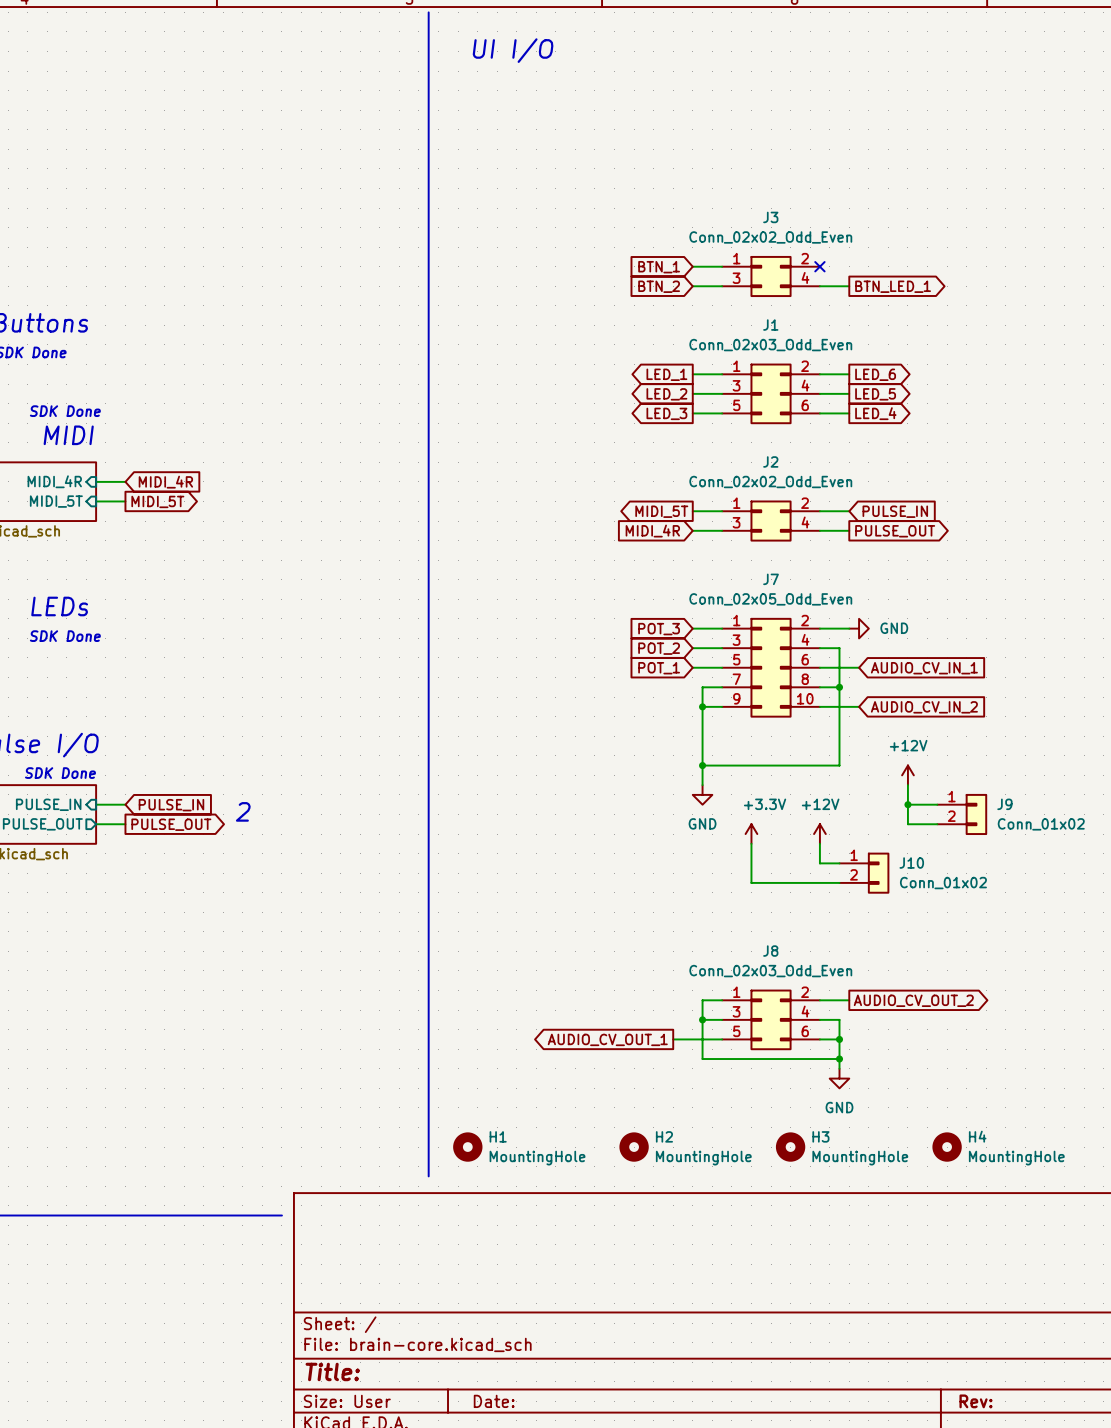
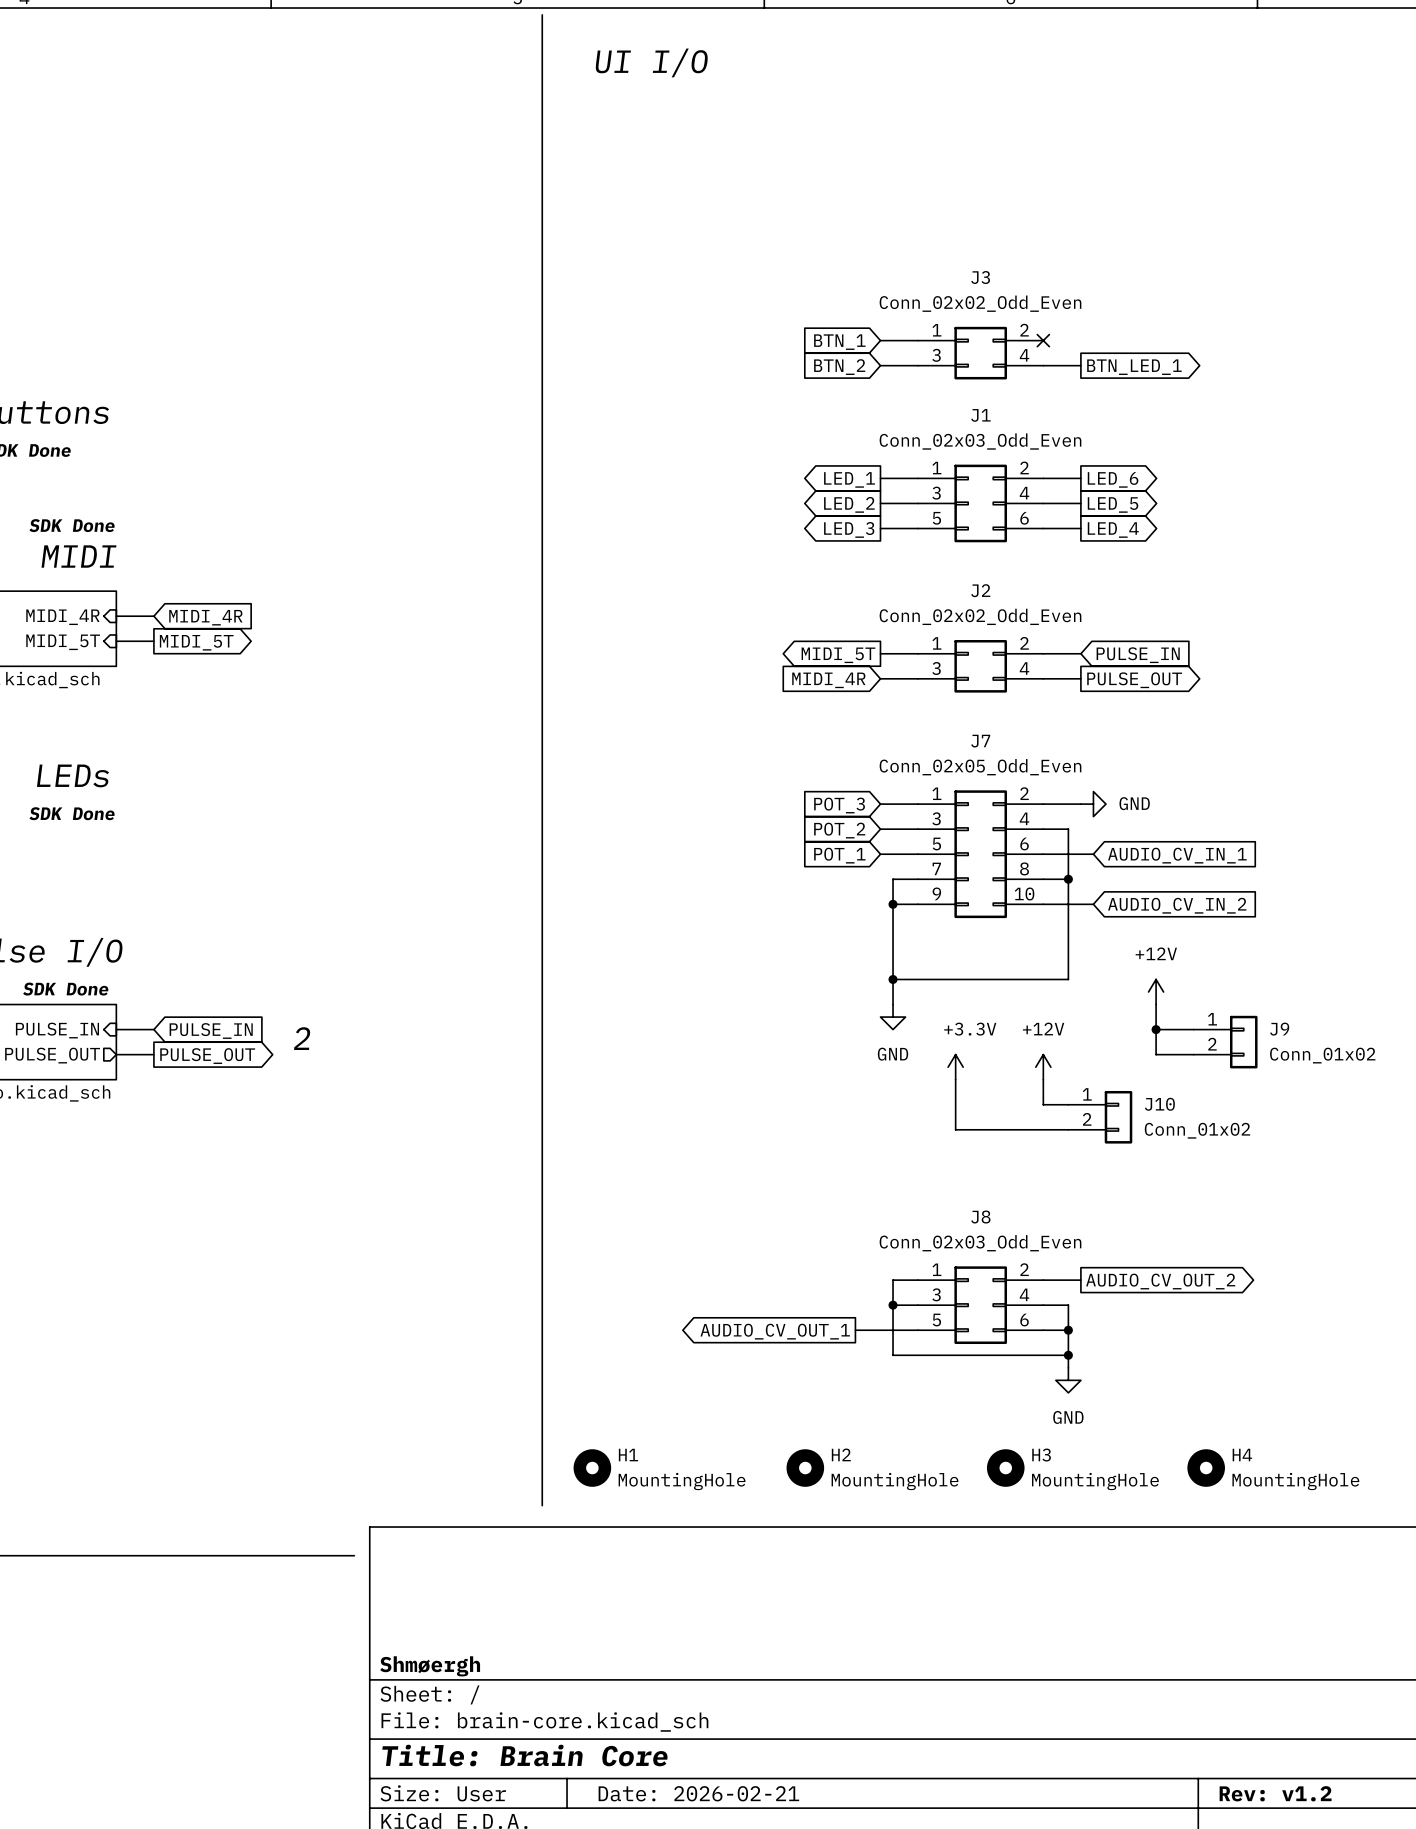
title block: none -> Shmøergh (430, 1666)
title block: Title: (332, 1371) -> Title: Brain Core (524, 1755)
title block: Date: (494, 1401) -> Date: 2026-02-21 (698, 1793)
title block: Rev: (976, 1401) -> Rev: v1.2 (1275, 1793)

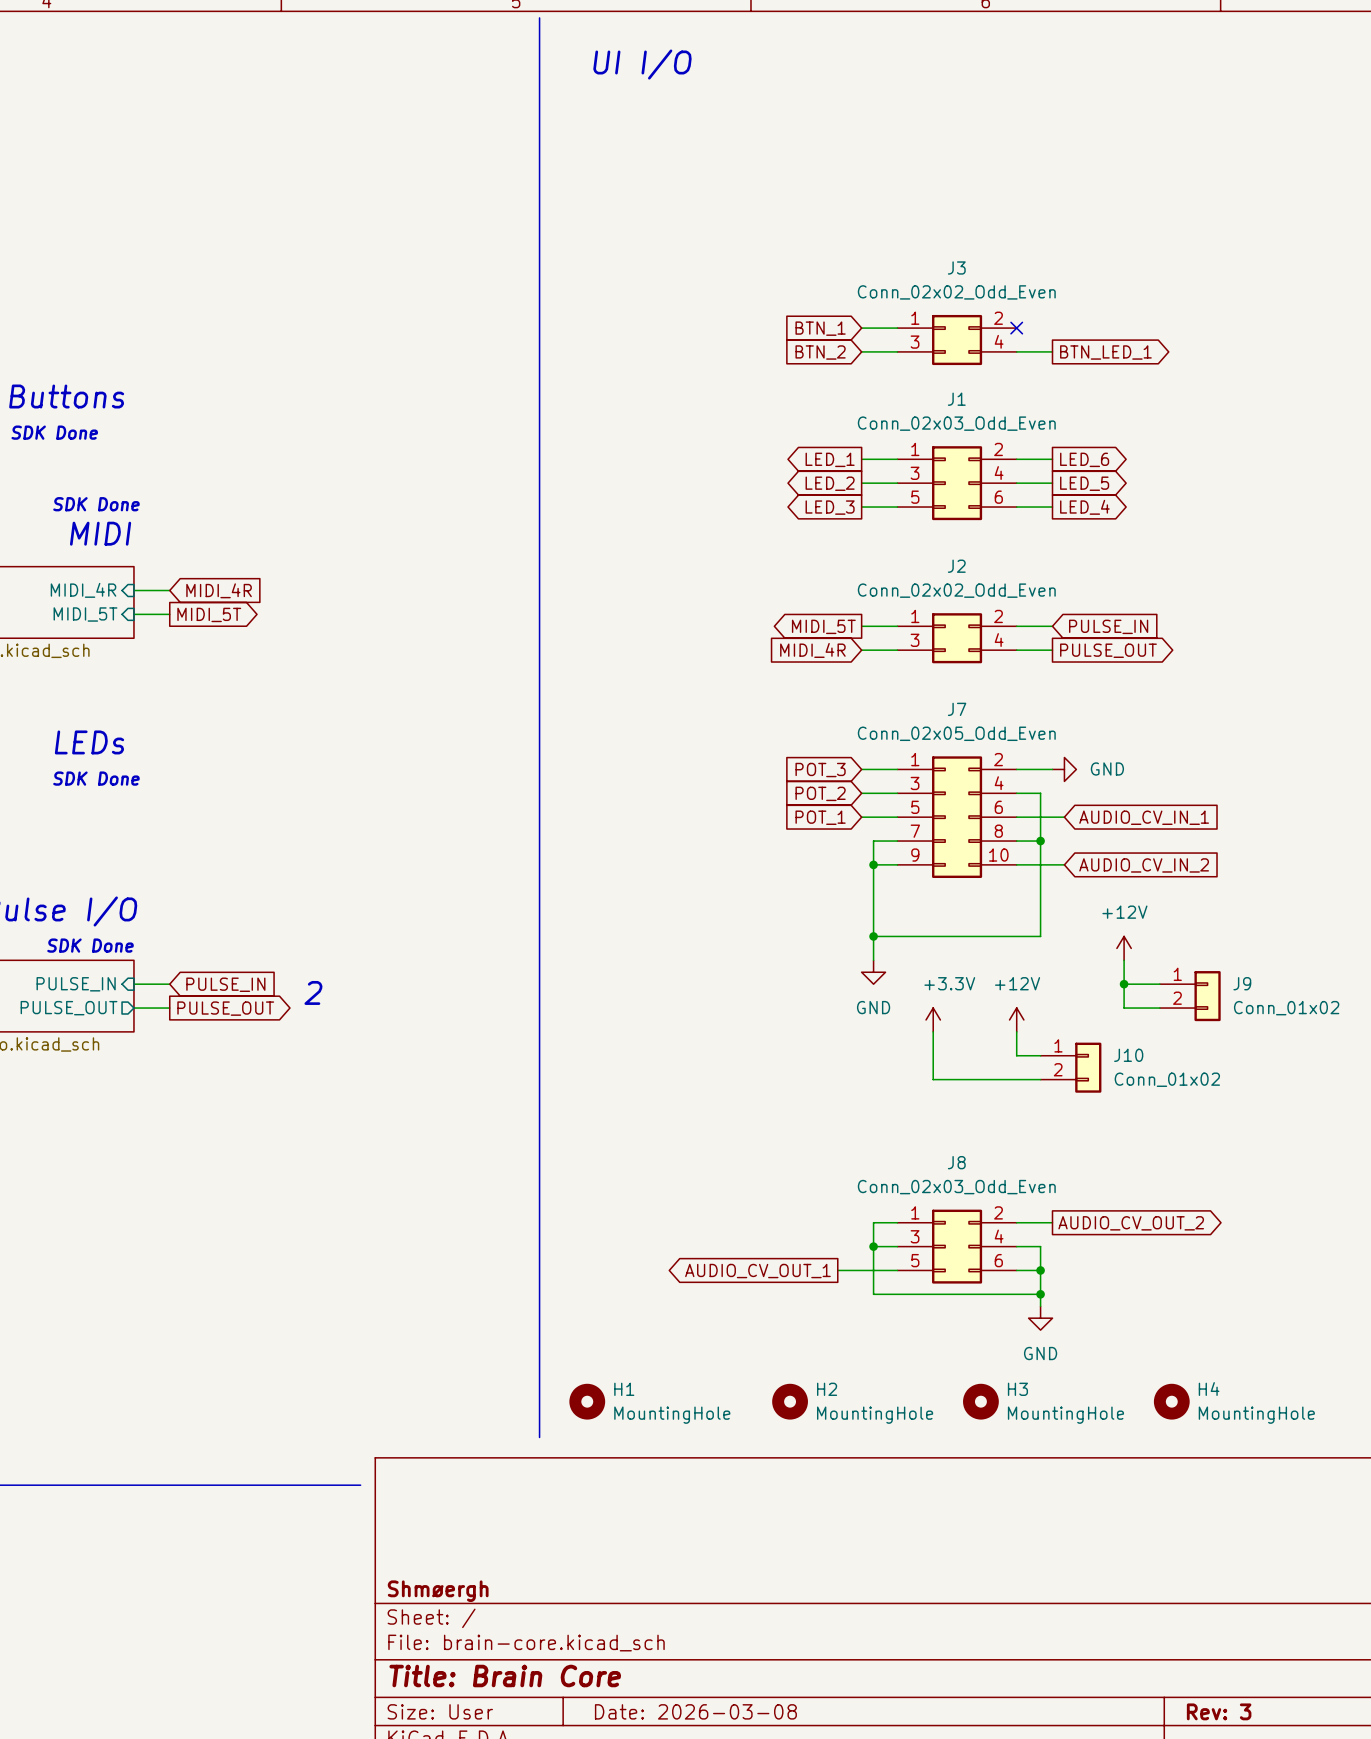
title block: Date: 2026-02-21 (698, 1793) -> Date: 2026-03-08 (695, 1711)
title block: Rev: v1.2 (1275, 1793) -> Rev: 3 (1219, 1711)

